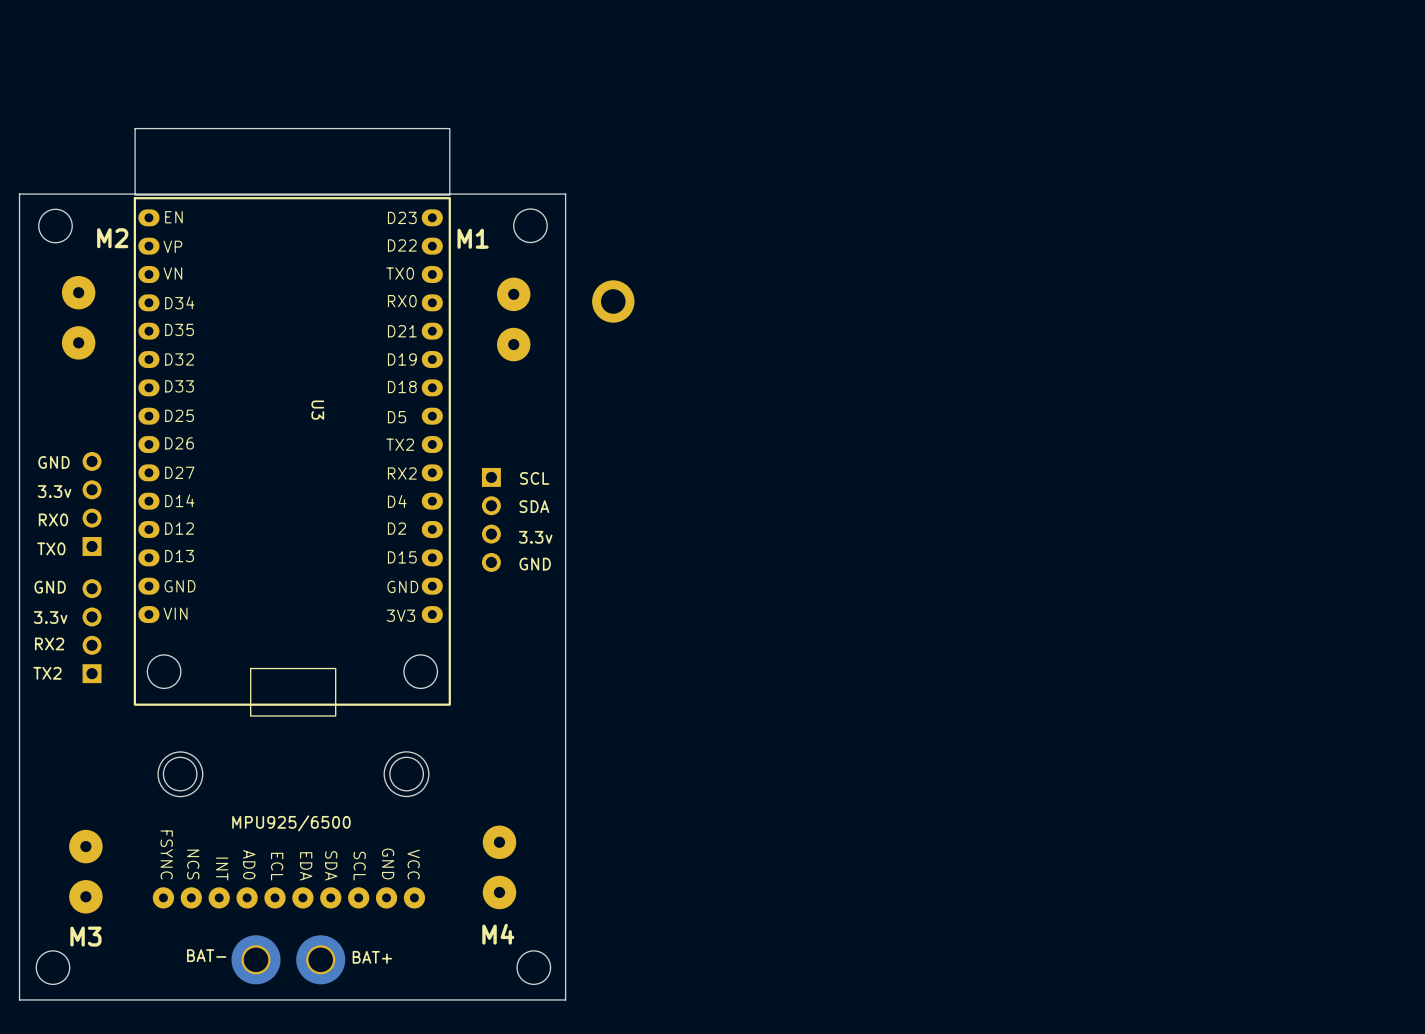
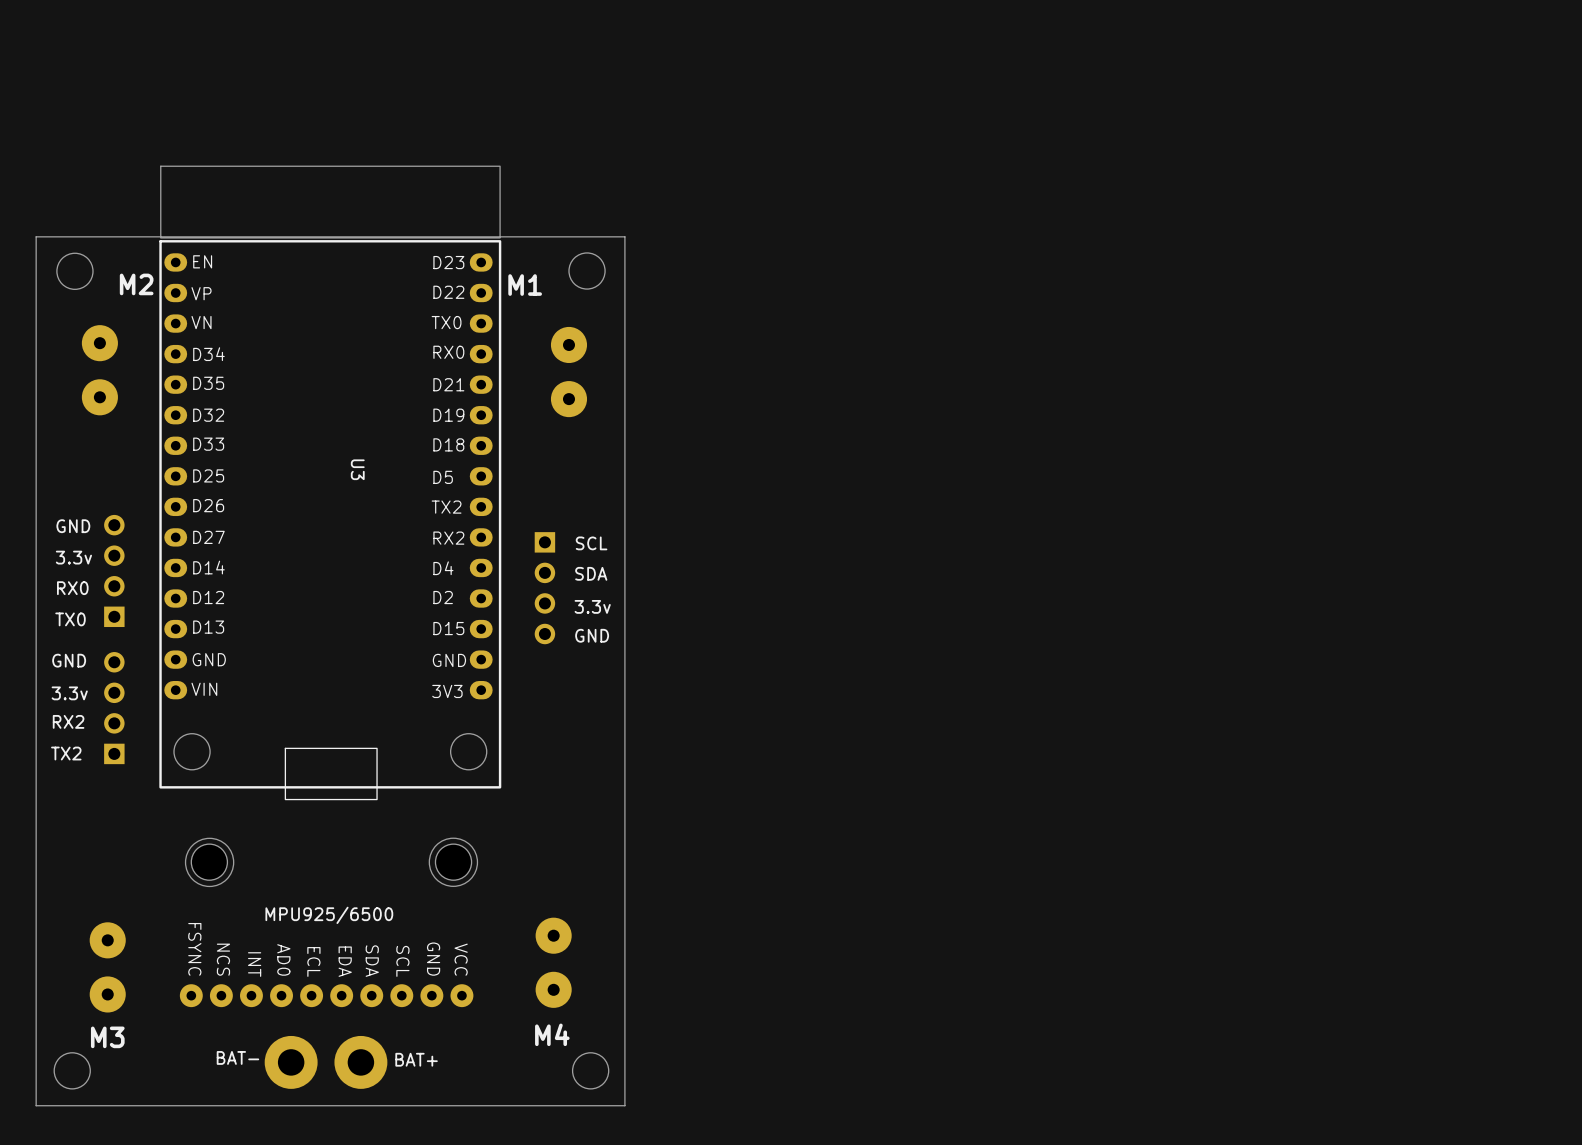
part: (613, 301) -> none

